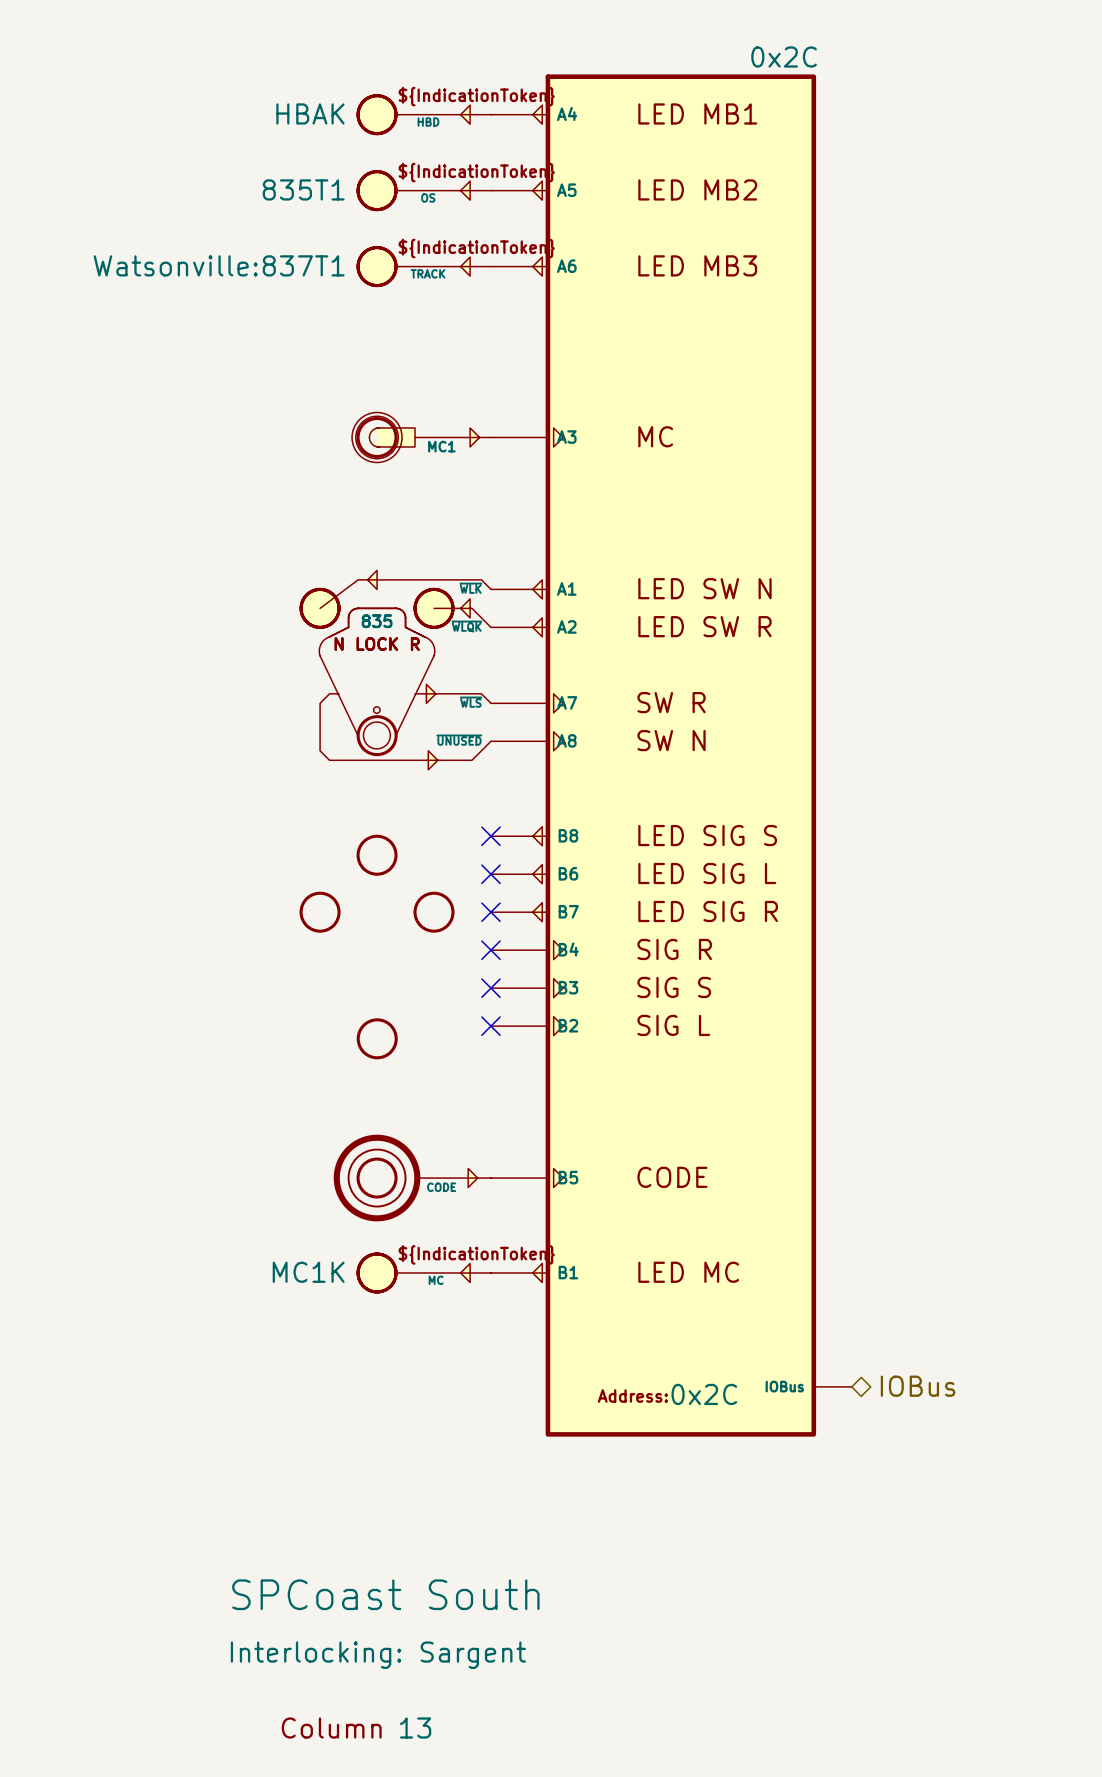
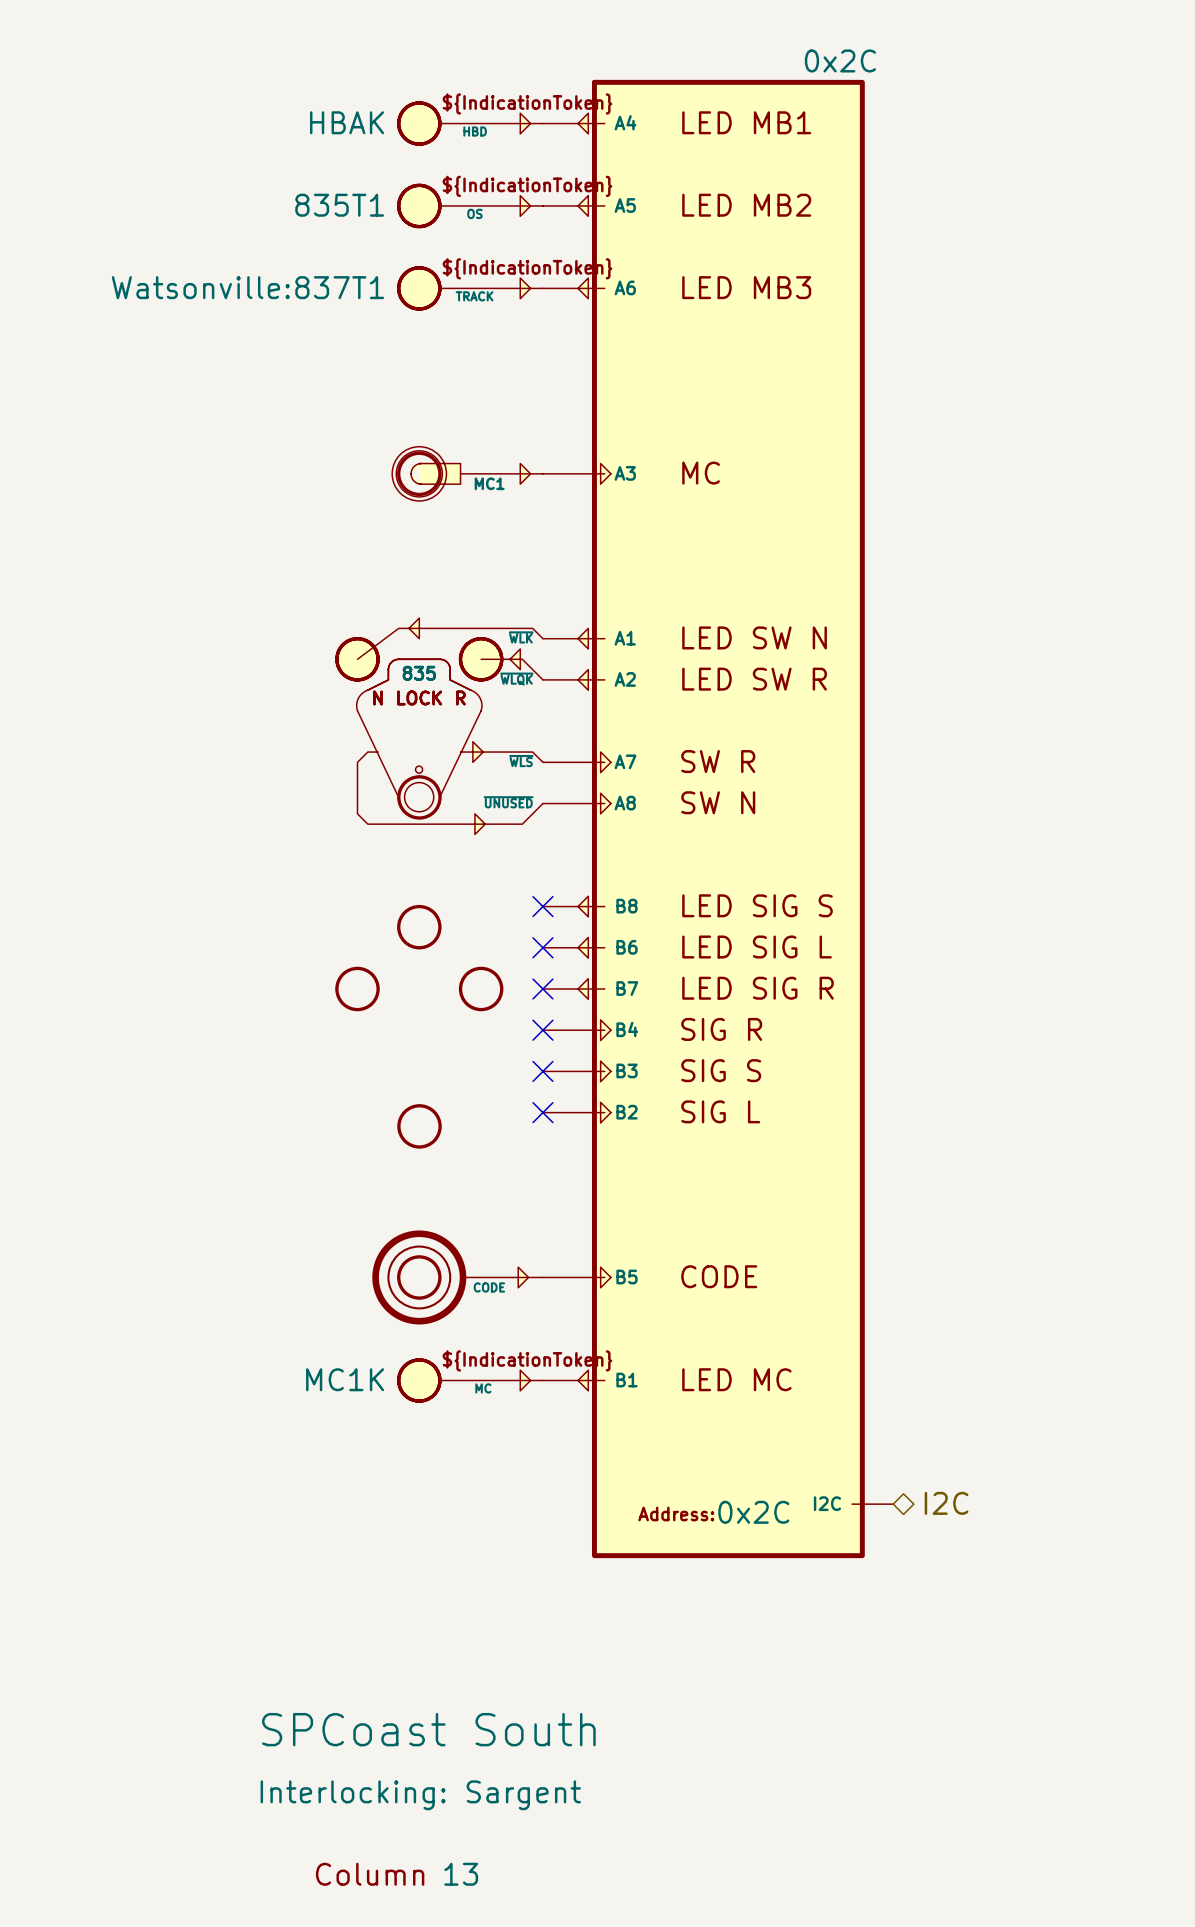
part symbol: [356, 94, 491, 136] -> [397, 101, 543, 146]
part symbol: [356, 170, 491, 212] -> [397, 183, 543, 229]
part symbol: [356, 246, 491, 288] -> [397, 266, 543, 311]
part: none -> 0x2C (718, 819)
part: 0x2C (671, 755) -> none
part symbol: [356, 1252, 491, 1294] -> [397, 1358, 543, 1403]
hierarchical label: none -> I2C (946, 1503)
hierarchical label: IOBus (918, 1386) -> none

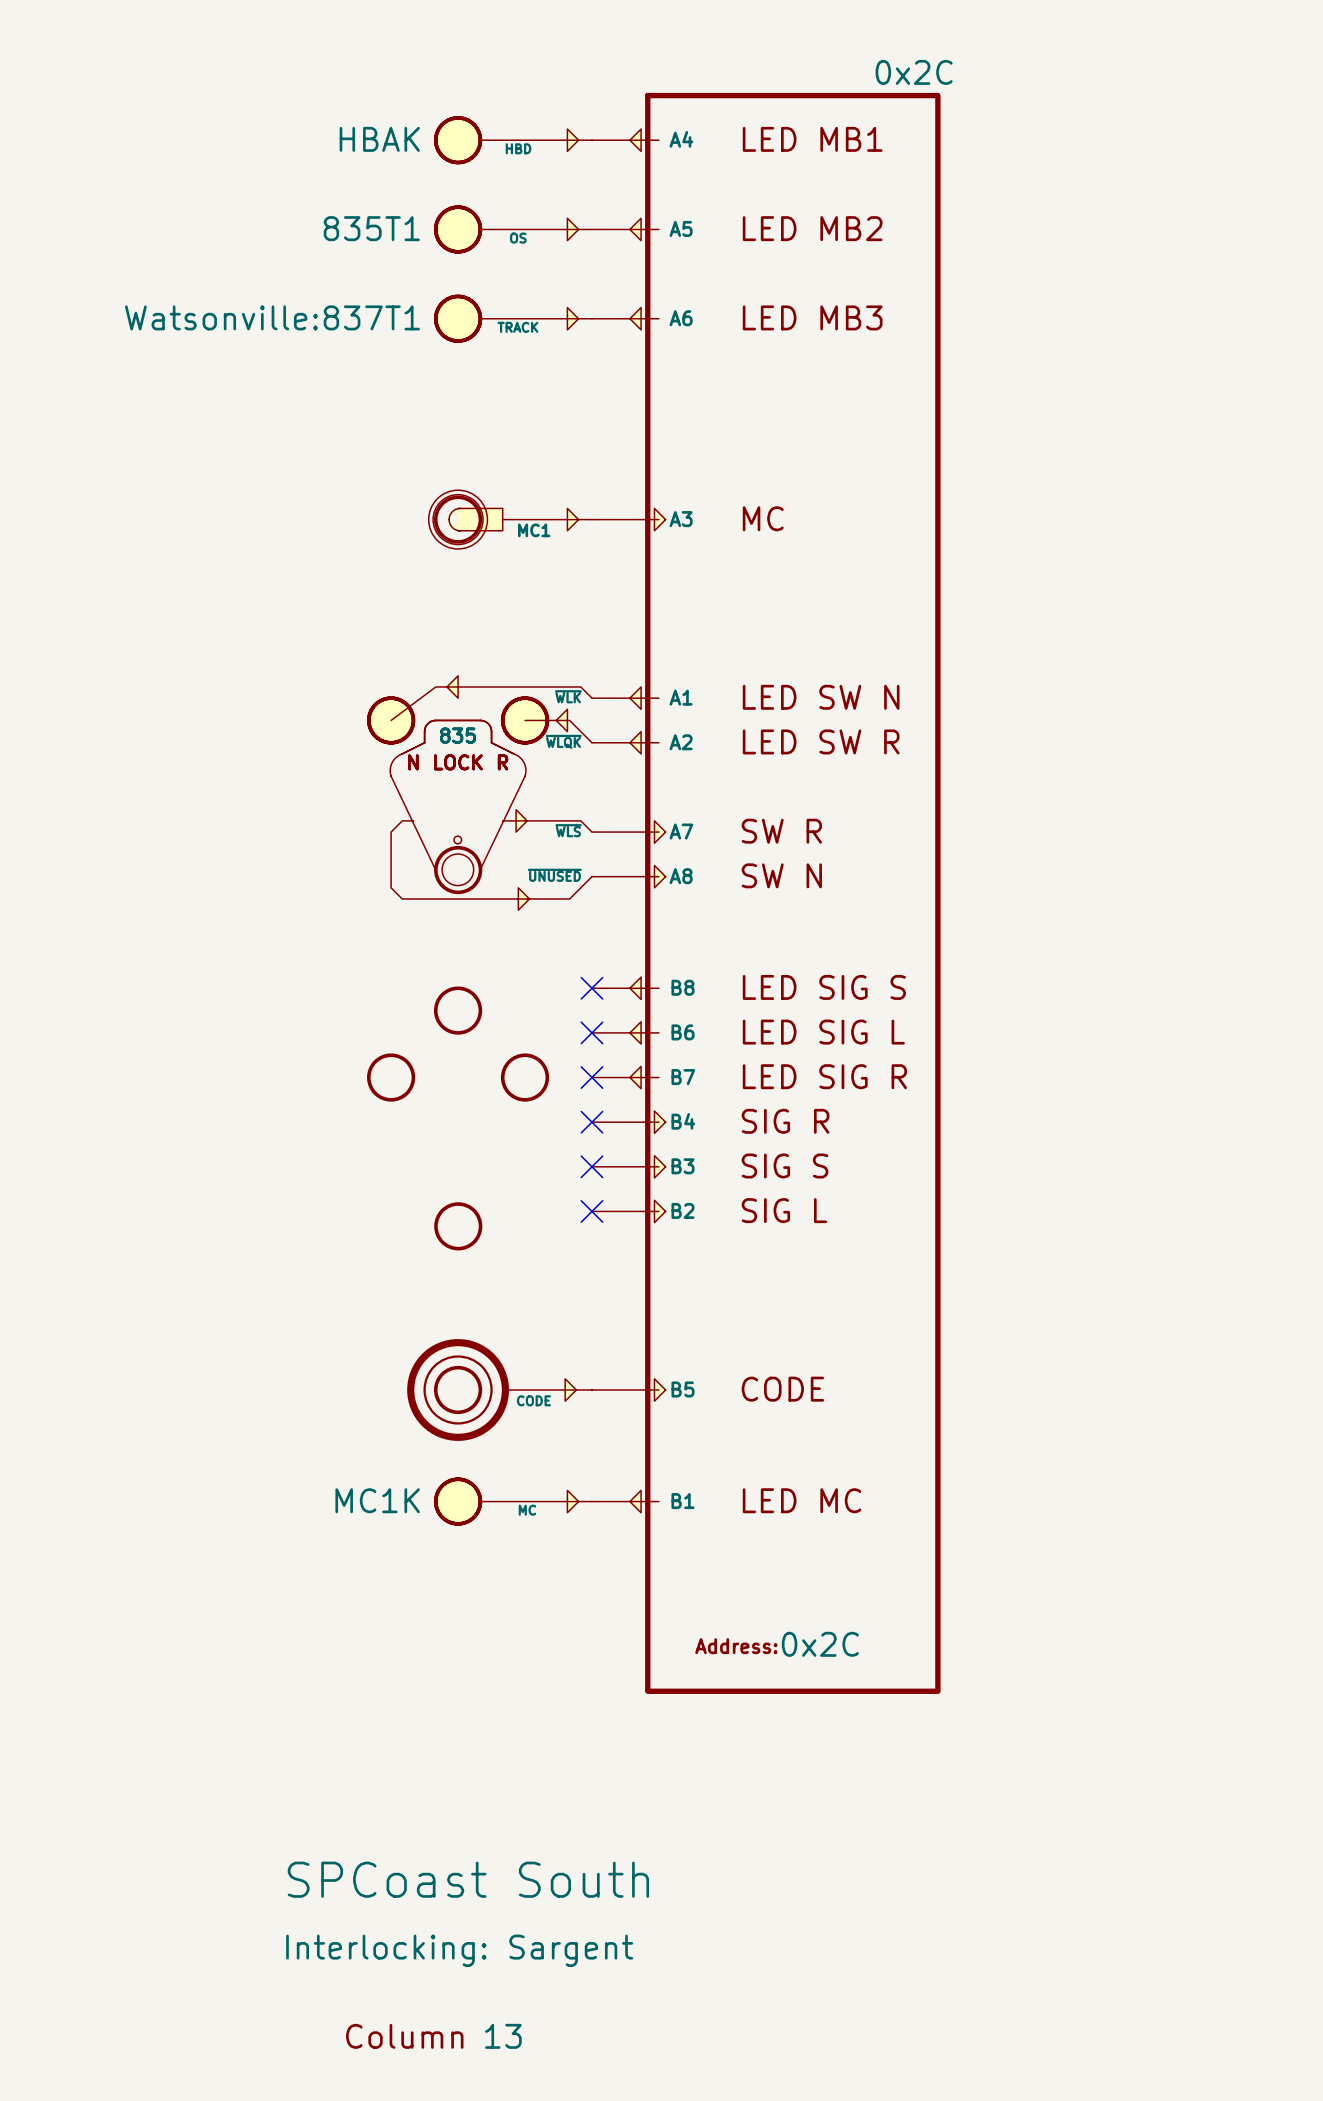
part symbol: [542, 79, 894, 1559] -> [591, 92, 941, 1694]
part text: ${IndicationToken} (527, 103) -> none
part text: ${IndicationToken} (527, 186) -> none
part text: ${IndicationToken} (527, 268) -> none
part text: ${IndicationToken} (527, 1360) -> none
hierarchical label: I2C (946, 1503) -> none

